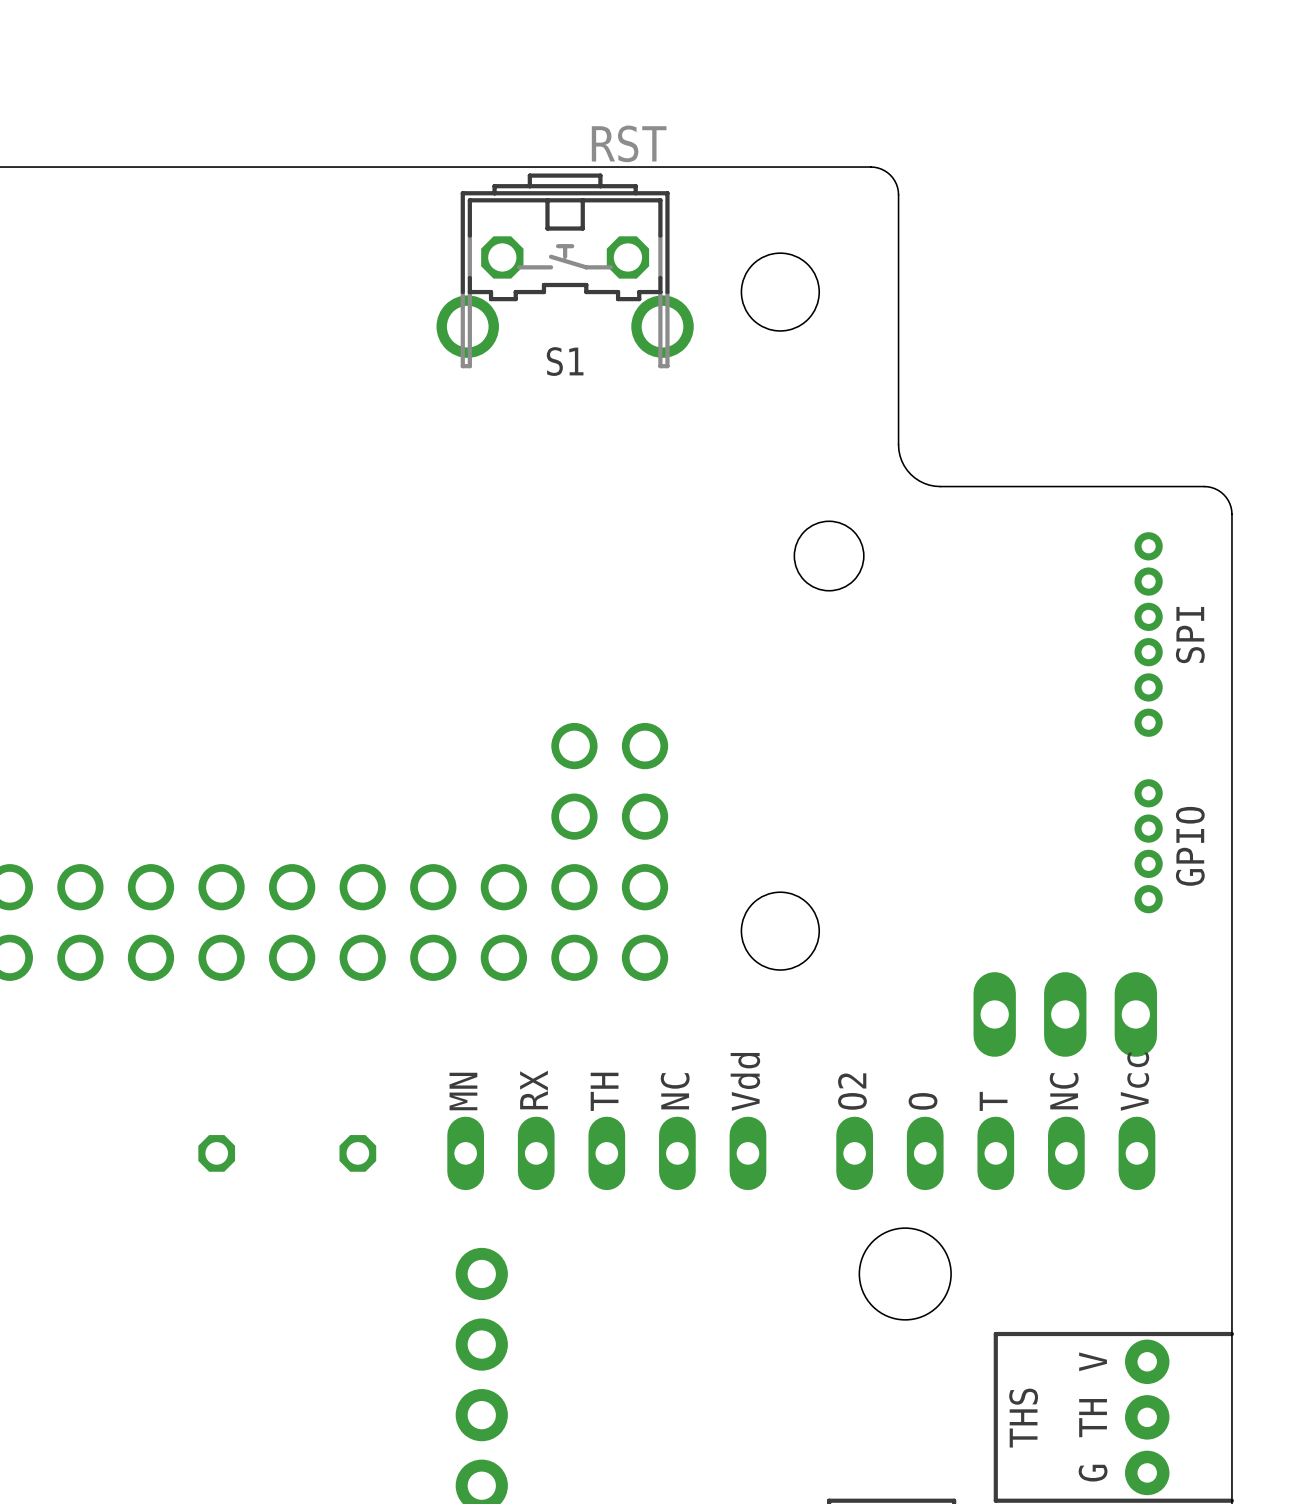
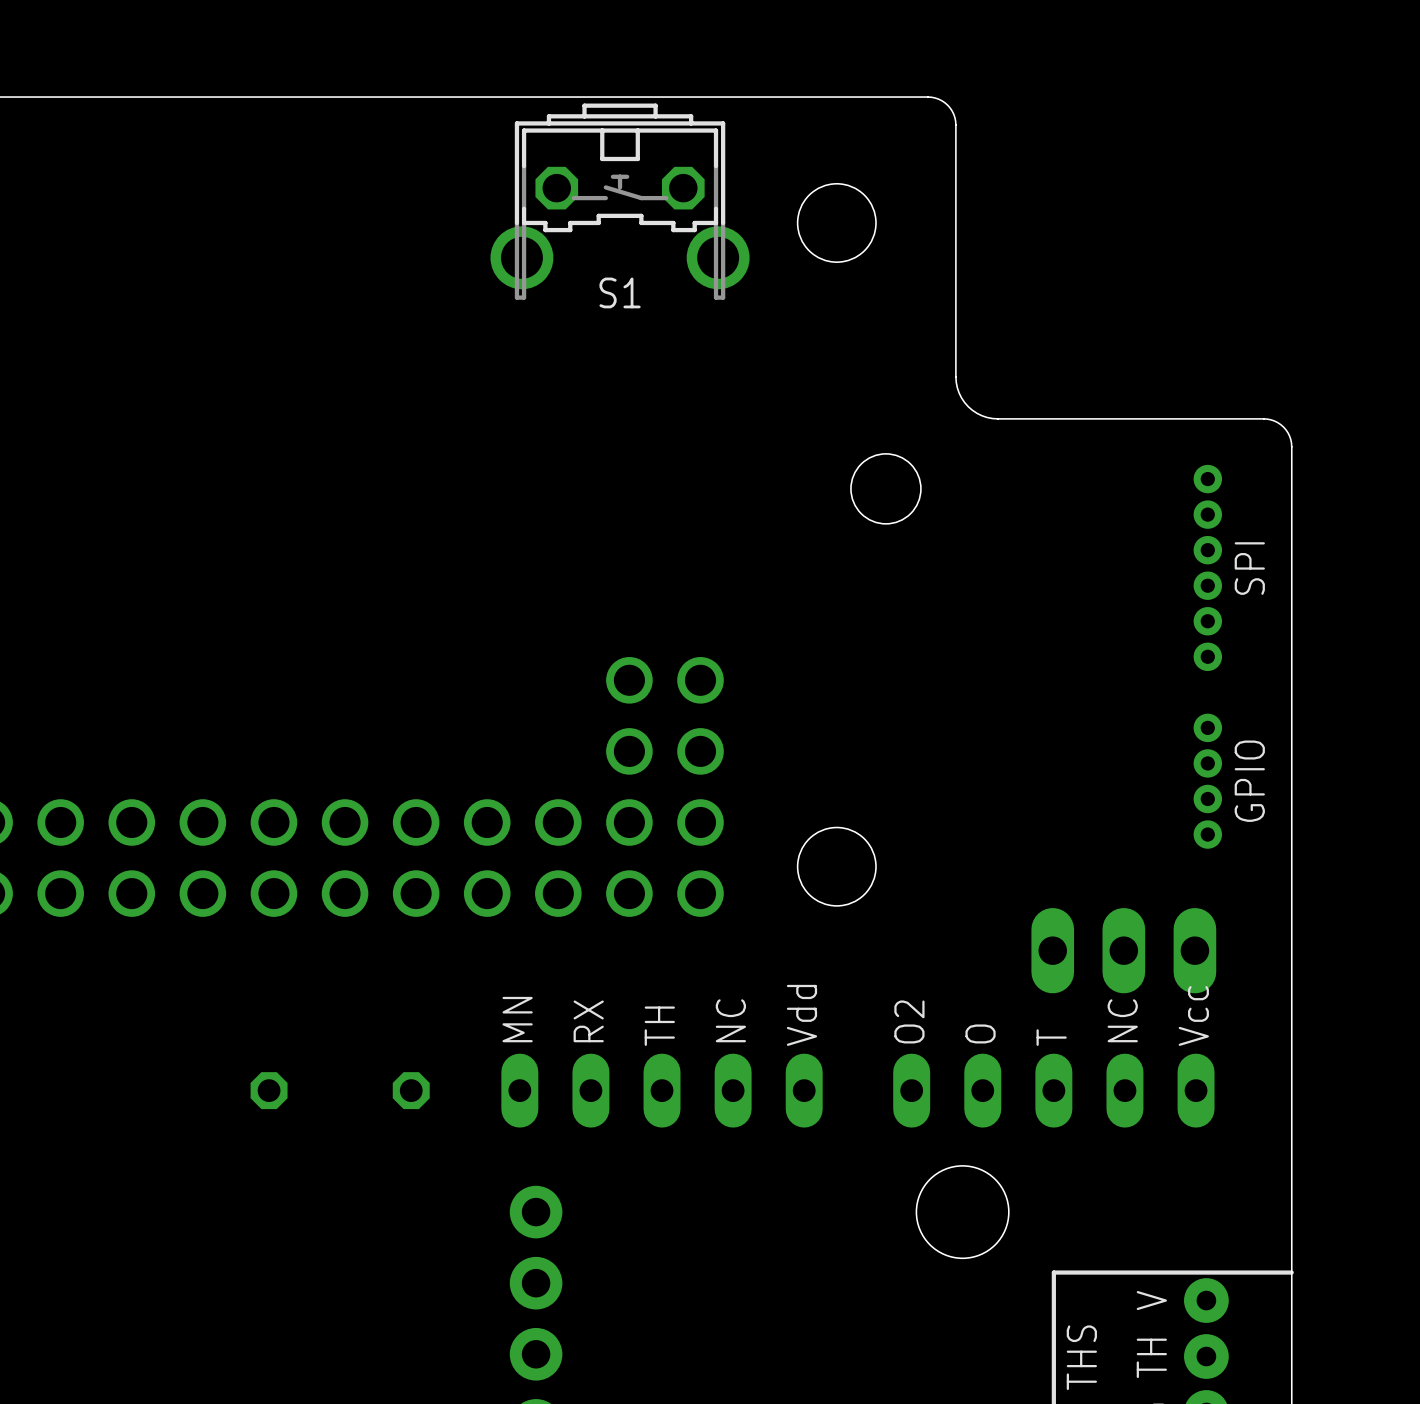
S1 value: RST (629, 143) -> none

